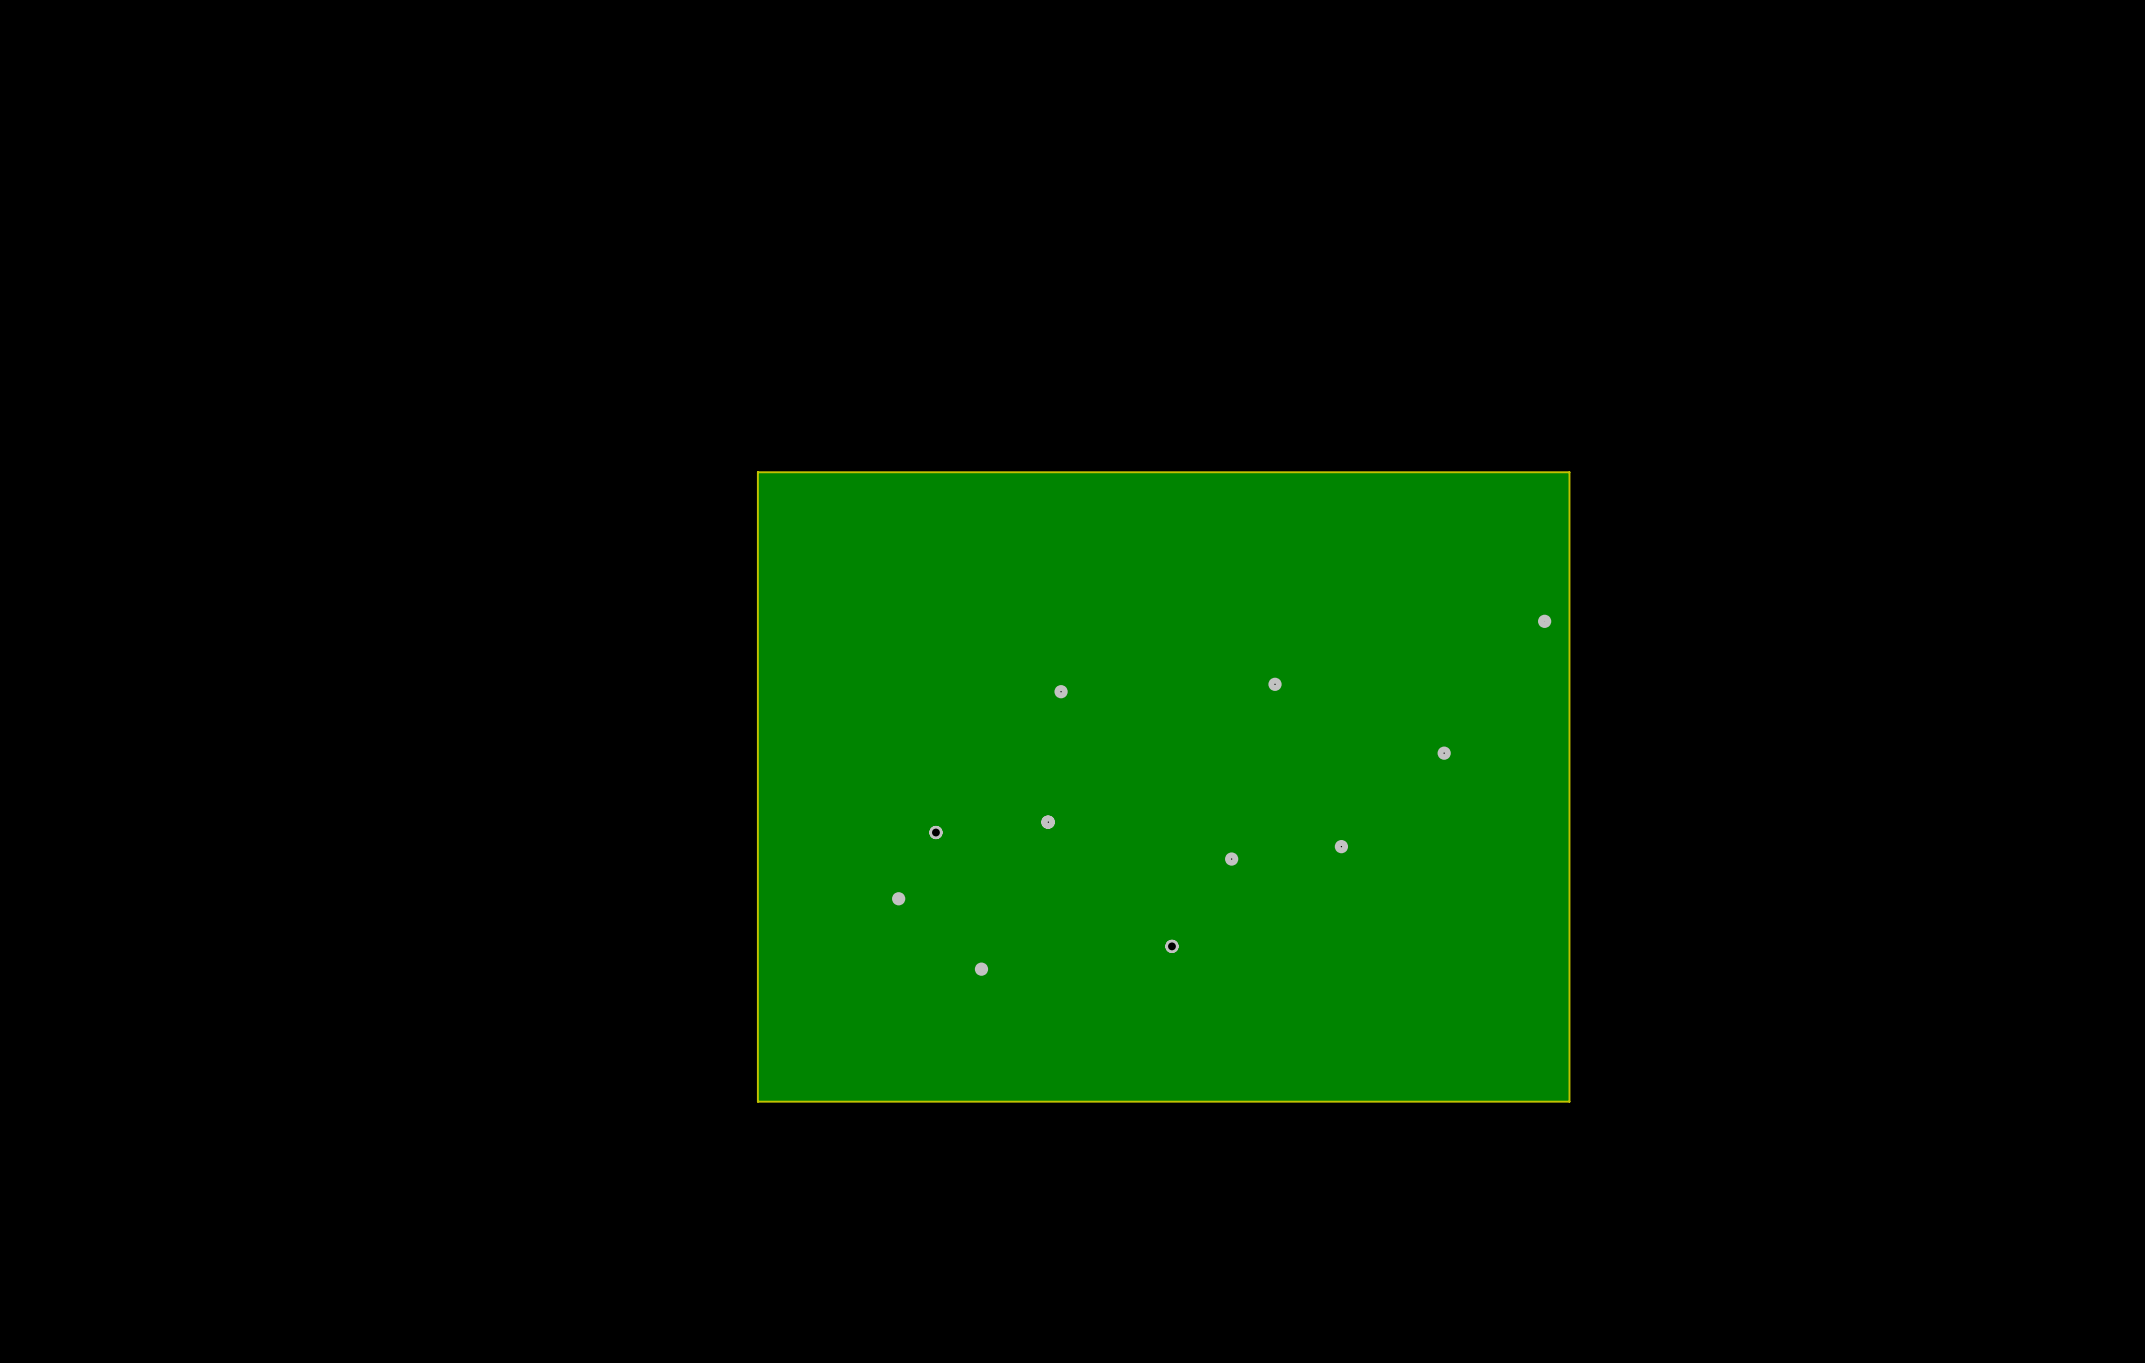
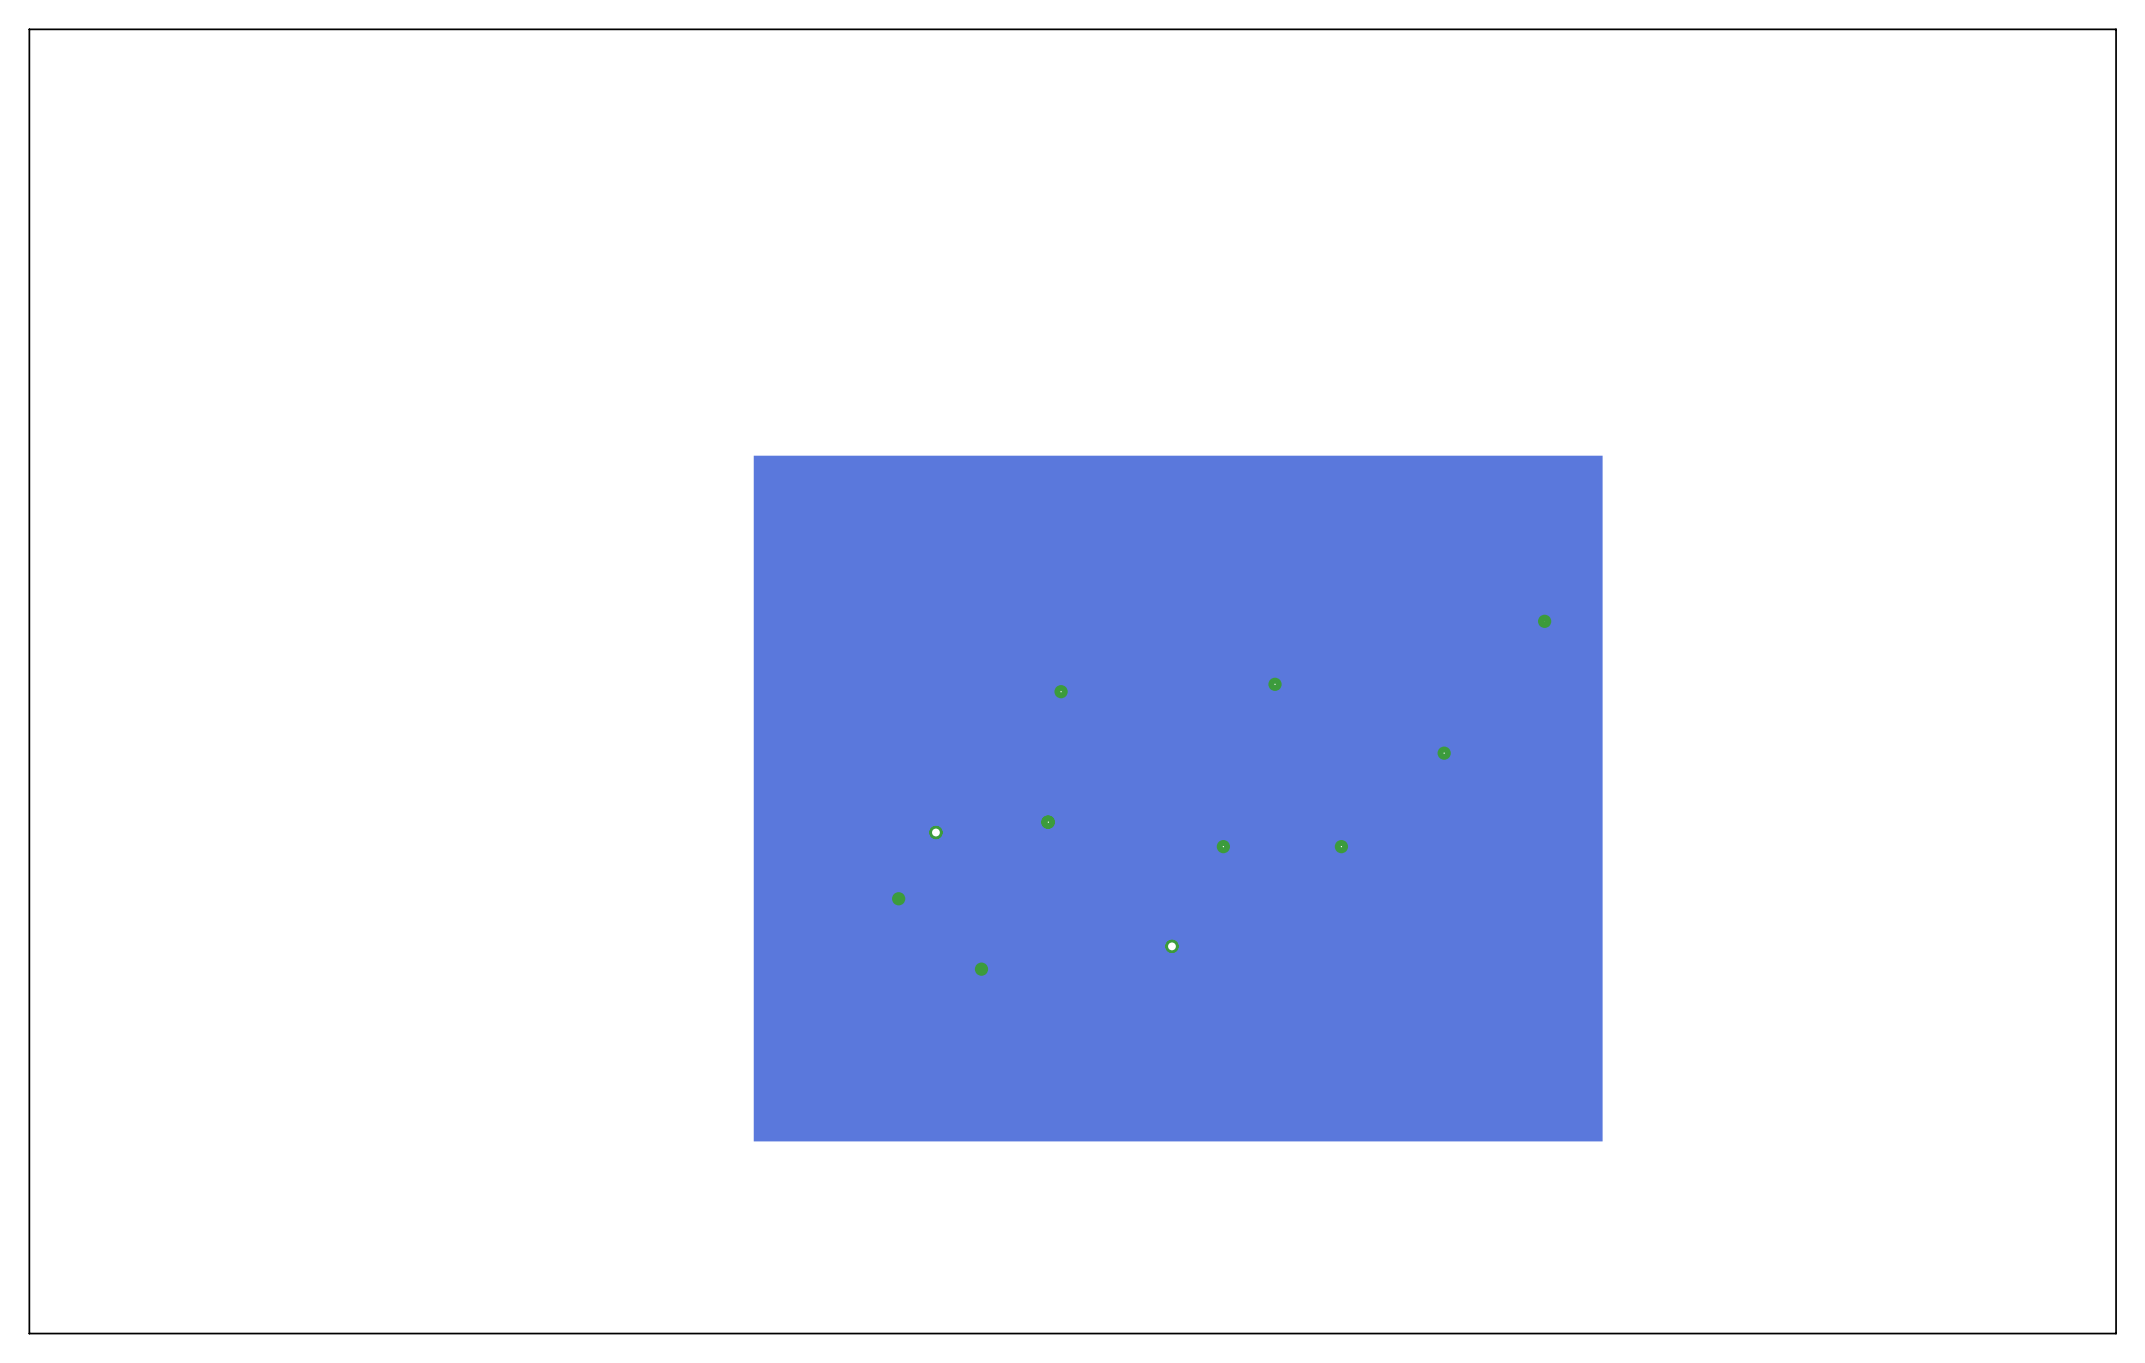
board edge: none -> (2116, 29) (29, 29) (29, 1333) (2116, 1333) (2116, 29)
drawing: none -> [753, 455, 1603, 1142]
drawing: [757, 472, 1570, 1102] -> none
board edge: (1569, 472) (757, 472) (757, 1101) (1569, 1101) (1569, 472) -> none
via position: (1231, 859) -> (1223, 846)

